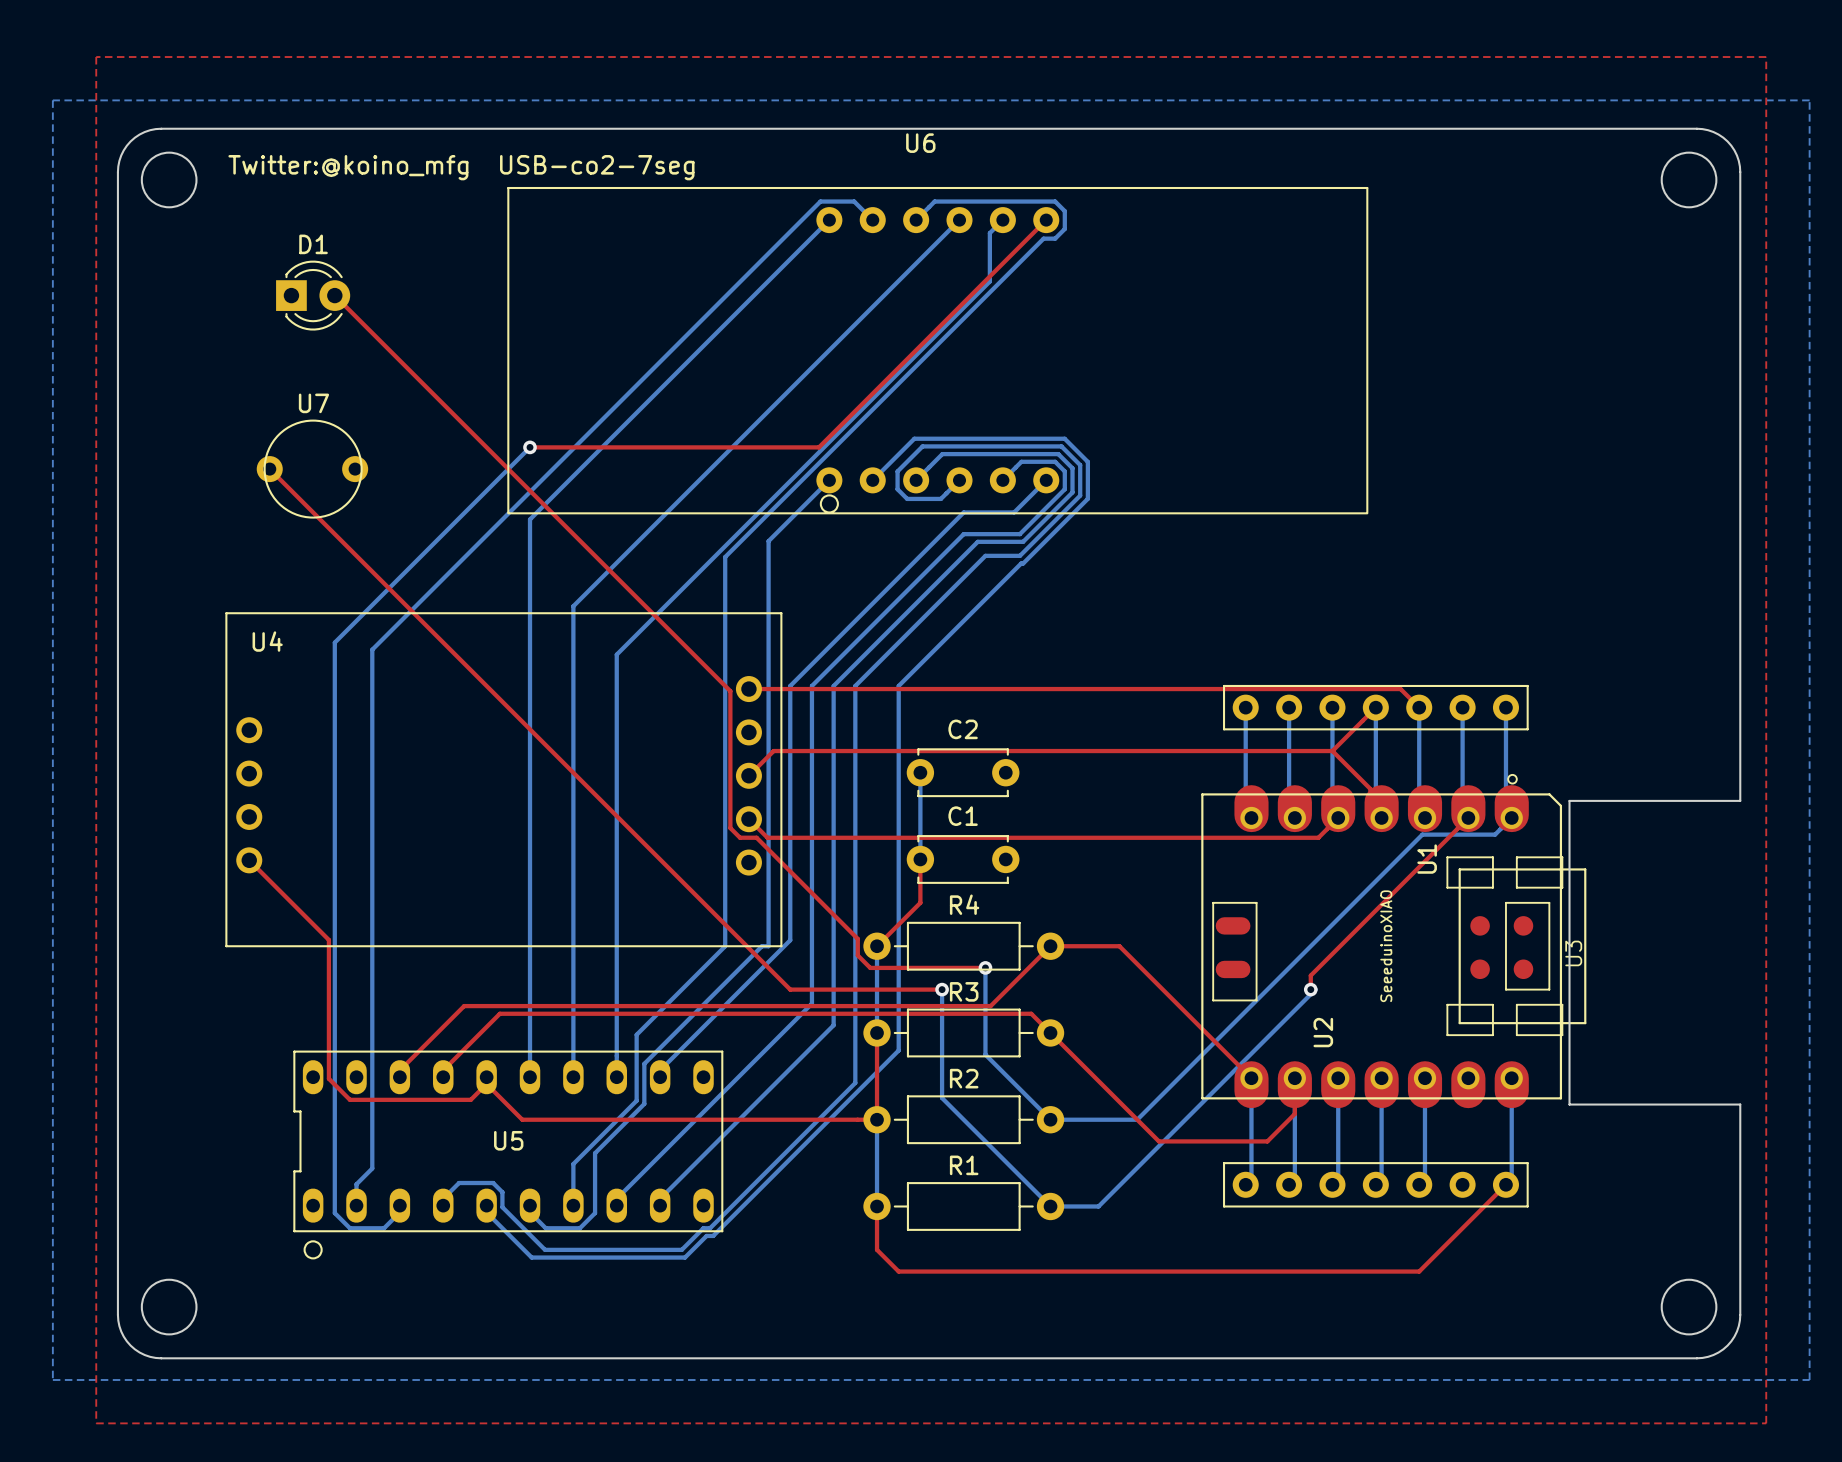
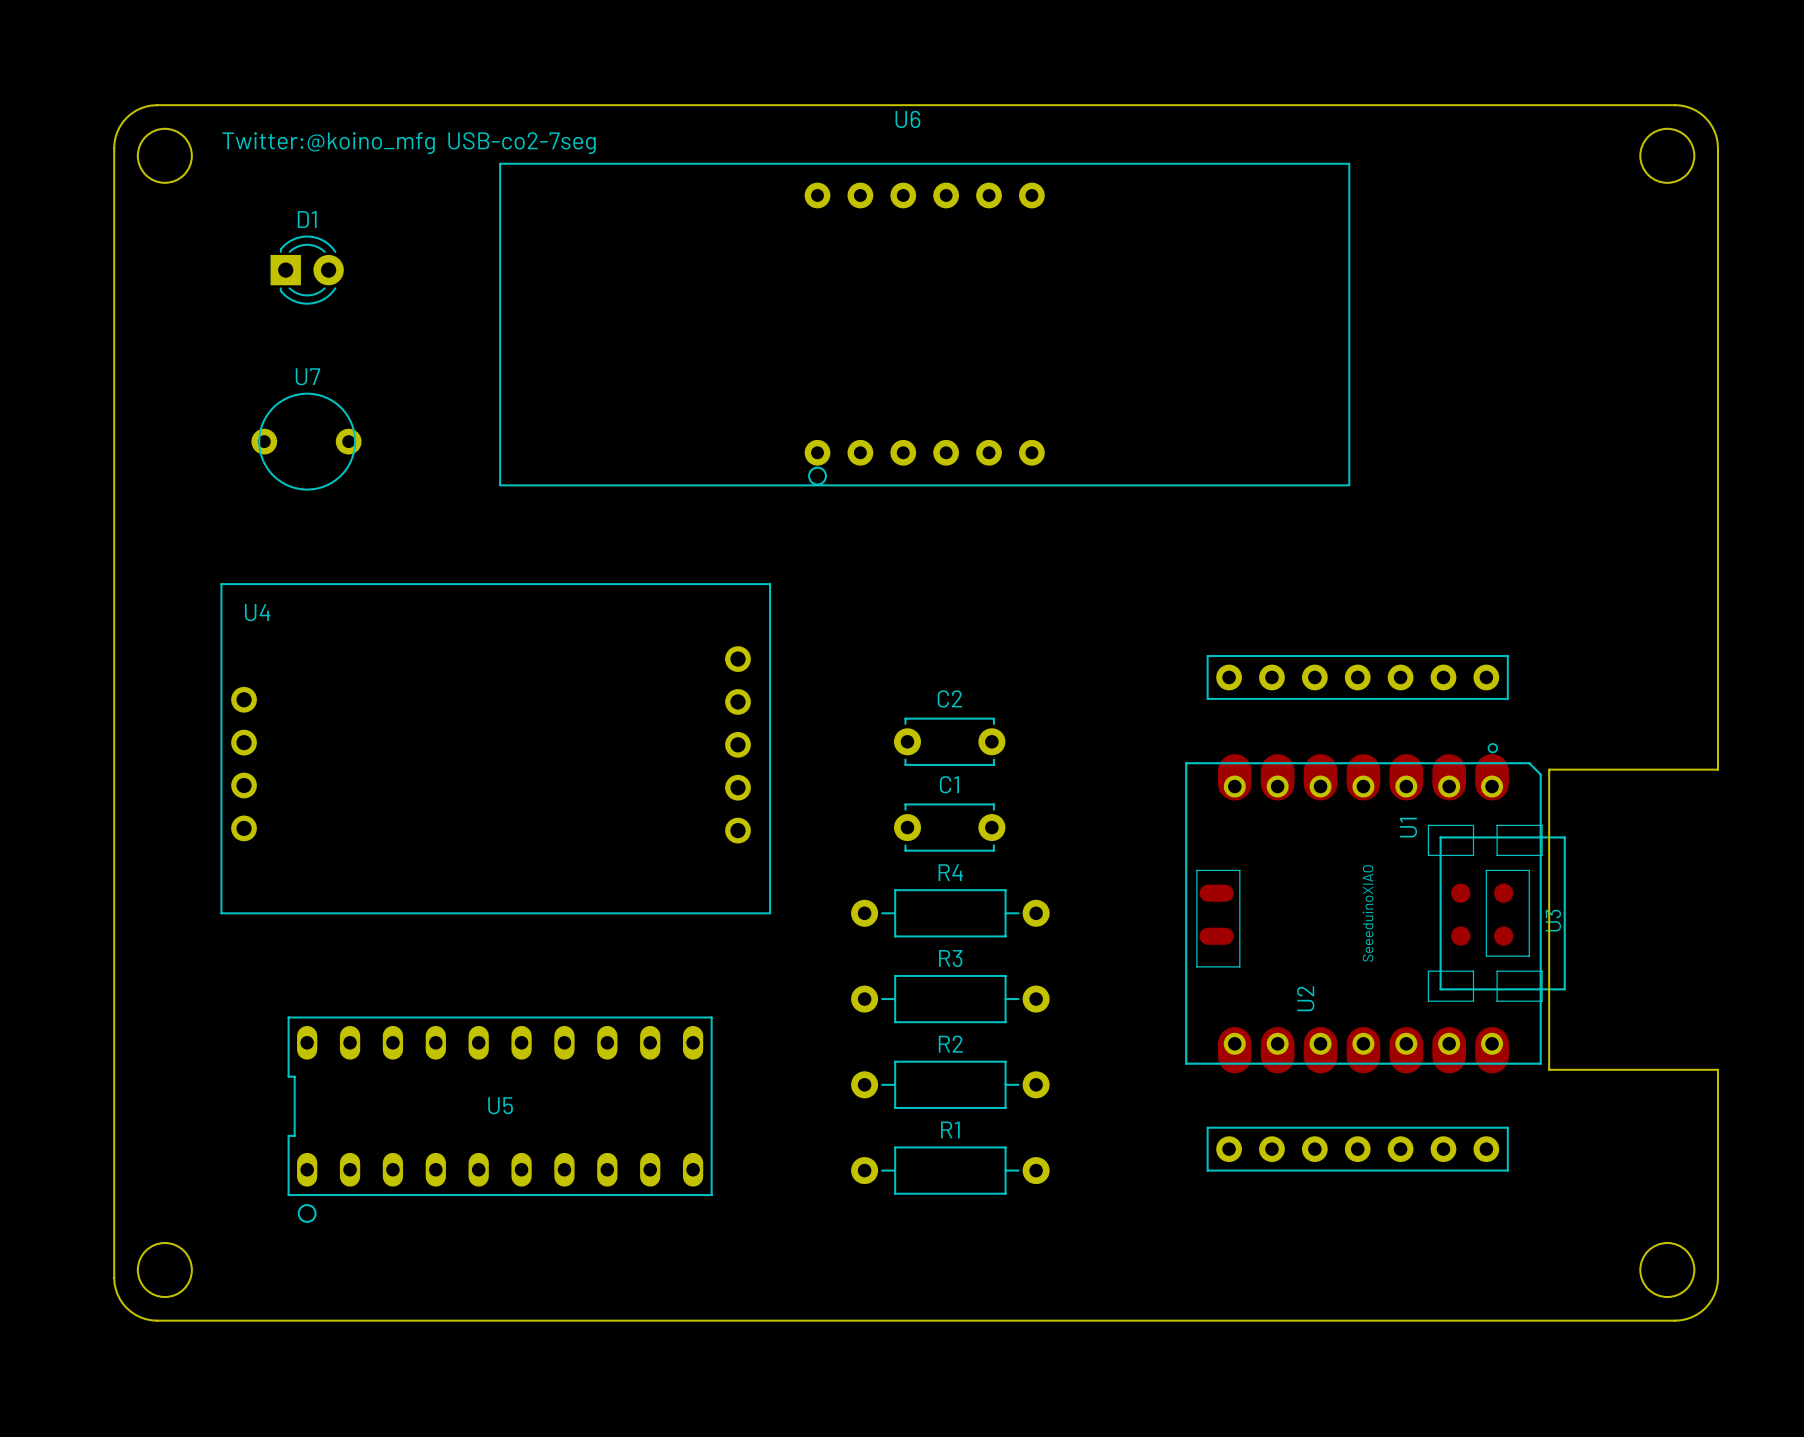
top zone outline: (96, 57) (1766, 57) (1766, 1423) (96, 1423) (96, 57) -> none
bottom zone outline: (52, 100) (1809, 100) (1809, 1379) (52, 1379) (52, 100) -> none
bottom track: (829, 220) (530, 519) (530, 1077) -> none
bottom track: (872, 220) (854, 201) (820, 201) (372, 649) (372, 1168) (356, 1184) (356, 1205) -> none
bottom track: (916, 220) (934, 201) (1055, 201) (1064, 211) (1064, 229) (1055, 238) (1043, 238) (725, 557) (725, 946) (636, 1034) (636, 1100) (573, 1164) (573, 1205) -> none
bottom track: (959, 220) (573, 606) (573, 1077) -> none
bottom track: (1002, 220) (989, 233) (989, 281) (616, 654) (616, 1077) -> none
top track: (1046, 220) (818, 447) (530, 447) -> none
top track: (334, 295) (730, 691) (730, 828) (740, 837) (756, 837) (857, 938) (857, 955) (870, 967) (985, 967) -> none
bottom track: (530, 447) (334, 642) (334, 1213) (349, 1228) (384, 1228) (399, 1212) (399, 1205) -> none
via: (530, 447) -> none
top track: (269, 469) (790, 989) (942, 989) -> none
bottom track: (829, 480) (768, 541) (768, 946) (761, 946) (644, 1063) (644, 1103) (595, 1153) (595, 1213) (579, 1228) (545, 1228) (530, 1212) (530, 1205) -> none
bottom track: (872, 480) (914, 438) (1064, 438) (1087, 461) (1087, 498) (898, 685) (898, 1050) (713, 1235) (706, 1235) (685, 1257) (531, 1257) (486, 1212) (486, 1205) -> none
bottom track: (916, 480) (942, 454) (1058, 454) (1072, 468) (1072, 492) (1023, 541) (977, 541) (833, 685) (833, 1025) (660, 1198) (660, 1205) -> none
bottom track: (959, 480) (940, 498) (907, 498) (897, 489) (897, 471) (922, 446) (1061, 446) (1080, 465) (1080, 495) (1019, 555) (985, 555) (855, 685) (855, 1082) (710, 1228) (703, 1228) (681, 1249) (545, 1249) (502, 1207) (502, 1192) (493, 1183) (459, 1183) (443, 1198) (443, 1205) -> none
bottom track: (1002, 480) (1021, 461) (1055, 461) (1064, 471) (1064, 489) (1019, 534) (963, 534) (811, 685) (811, 1003) (616, 1198) (616, 1205) -> none
bottom track: (1046, 480) (1014, 512) (963, 512) (790, 685) (790, 940) (660, 1070) (660, 1077) -> none
top track: (748, 689) (1400, 689) (1419, 707) -> none
bottom track: (1245, 707) (1245, 812) (1251, 817) -> none
bottom track: (1289, 707) (1289, 812) (1294, 817) -> none
bottom track: (1332, 707) (1332, 812) (1338, 817) -> none
top track: (1375, 707) (1332, 751) -> none
bottom track: (1375, 707) (1375, 812) (1381, 817) -> none
bottom track: (1419, 707) (1419, 812) (1425, 817) -> none
bottom track: (1462, 707) (1462, 812) (1468, 817) -> none
bottom track: (1505, 707) (1505, 812) (1511, 817) (1495, 834) (1422, 834) (1137, 1119) (1050, 1119) (985, 1054) (985, 967) -> none
top track: (1332, 751) (773, 751) (748, 775) -> none
top track: (1332, 751) (1370, 789) (1370, 806) (1381, 817) -> none
bottom track: (920, 772) (920, 859) -> none
top track: (1338, 817) (1318, 837) (767, 837) (748, 819) -> none
top track: (1468, 817) (1310, 975) (1310, 989) -> none
top track: (920, 859) (920, 902) (877, 946) -> none
top track: (249, 860) (328, 939) (328, 1078) (349, 1099) (470, 1099) (486, 1084) -> none
bottom track: (877, 946) (877, 1032) -> none
via: (985, 967) -> none
bottom track: (942, 989) (942, 1098) (1050, 1206) (1098, 1206) (1315, 989) (1310, 989) -> none
via: (942, 989) -> none
via: (1310, 989) -> none
top track: (877, 1032) (877, 1119) (522, 1119) (486, 1084) -> none
top track: (399, 1077) (399, 1070) (464, 1006) (990, 1006) (1050, 946) (1119, 946) (1251, 1078) -> none
top track: (443, 1077) (443, 1070) (499, 1013) (1031, 1013) (1158, 1141) (1267, 1141) (1294, 1113) (1294, 1084) -> none
bottom track: (1251, 1078) (1251, 1179) (1245, 1184) -> none
bottom track: (1294, 1078) (1294, 1179) (1289, 1184) -> none
bottom track: (1338, 1078) (1338, 1179) (1332, 1184) -> none
bottom track: (1381, 1078) (1381, 1179) (1375, 1184) -> none
bottom track: (1424, 1078) (1424, 1179) (1419, 1184) -> none
bottom track: (1511, 1078) (1511, 1179) (1505, 1184) -> none
bottom track: (877, 1119) (877, 1206) -> none
top track: (1505, 1184) (1419, 1271) (898, 1271) (877, 1249) (877, 1206) -> none

